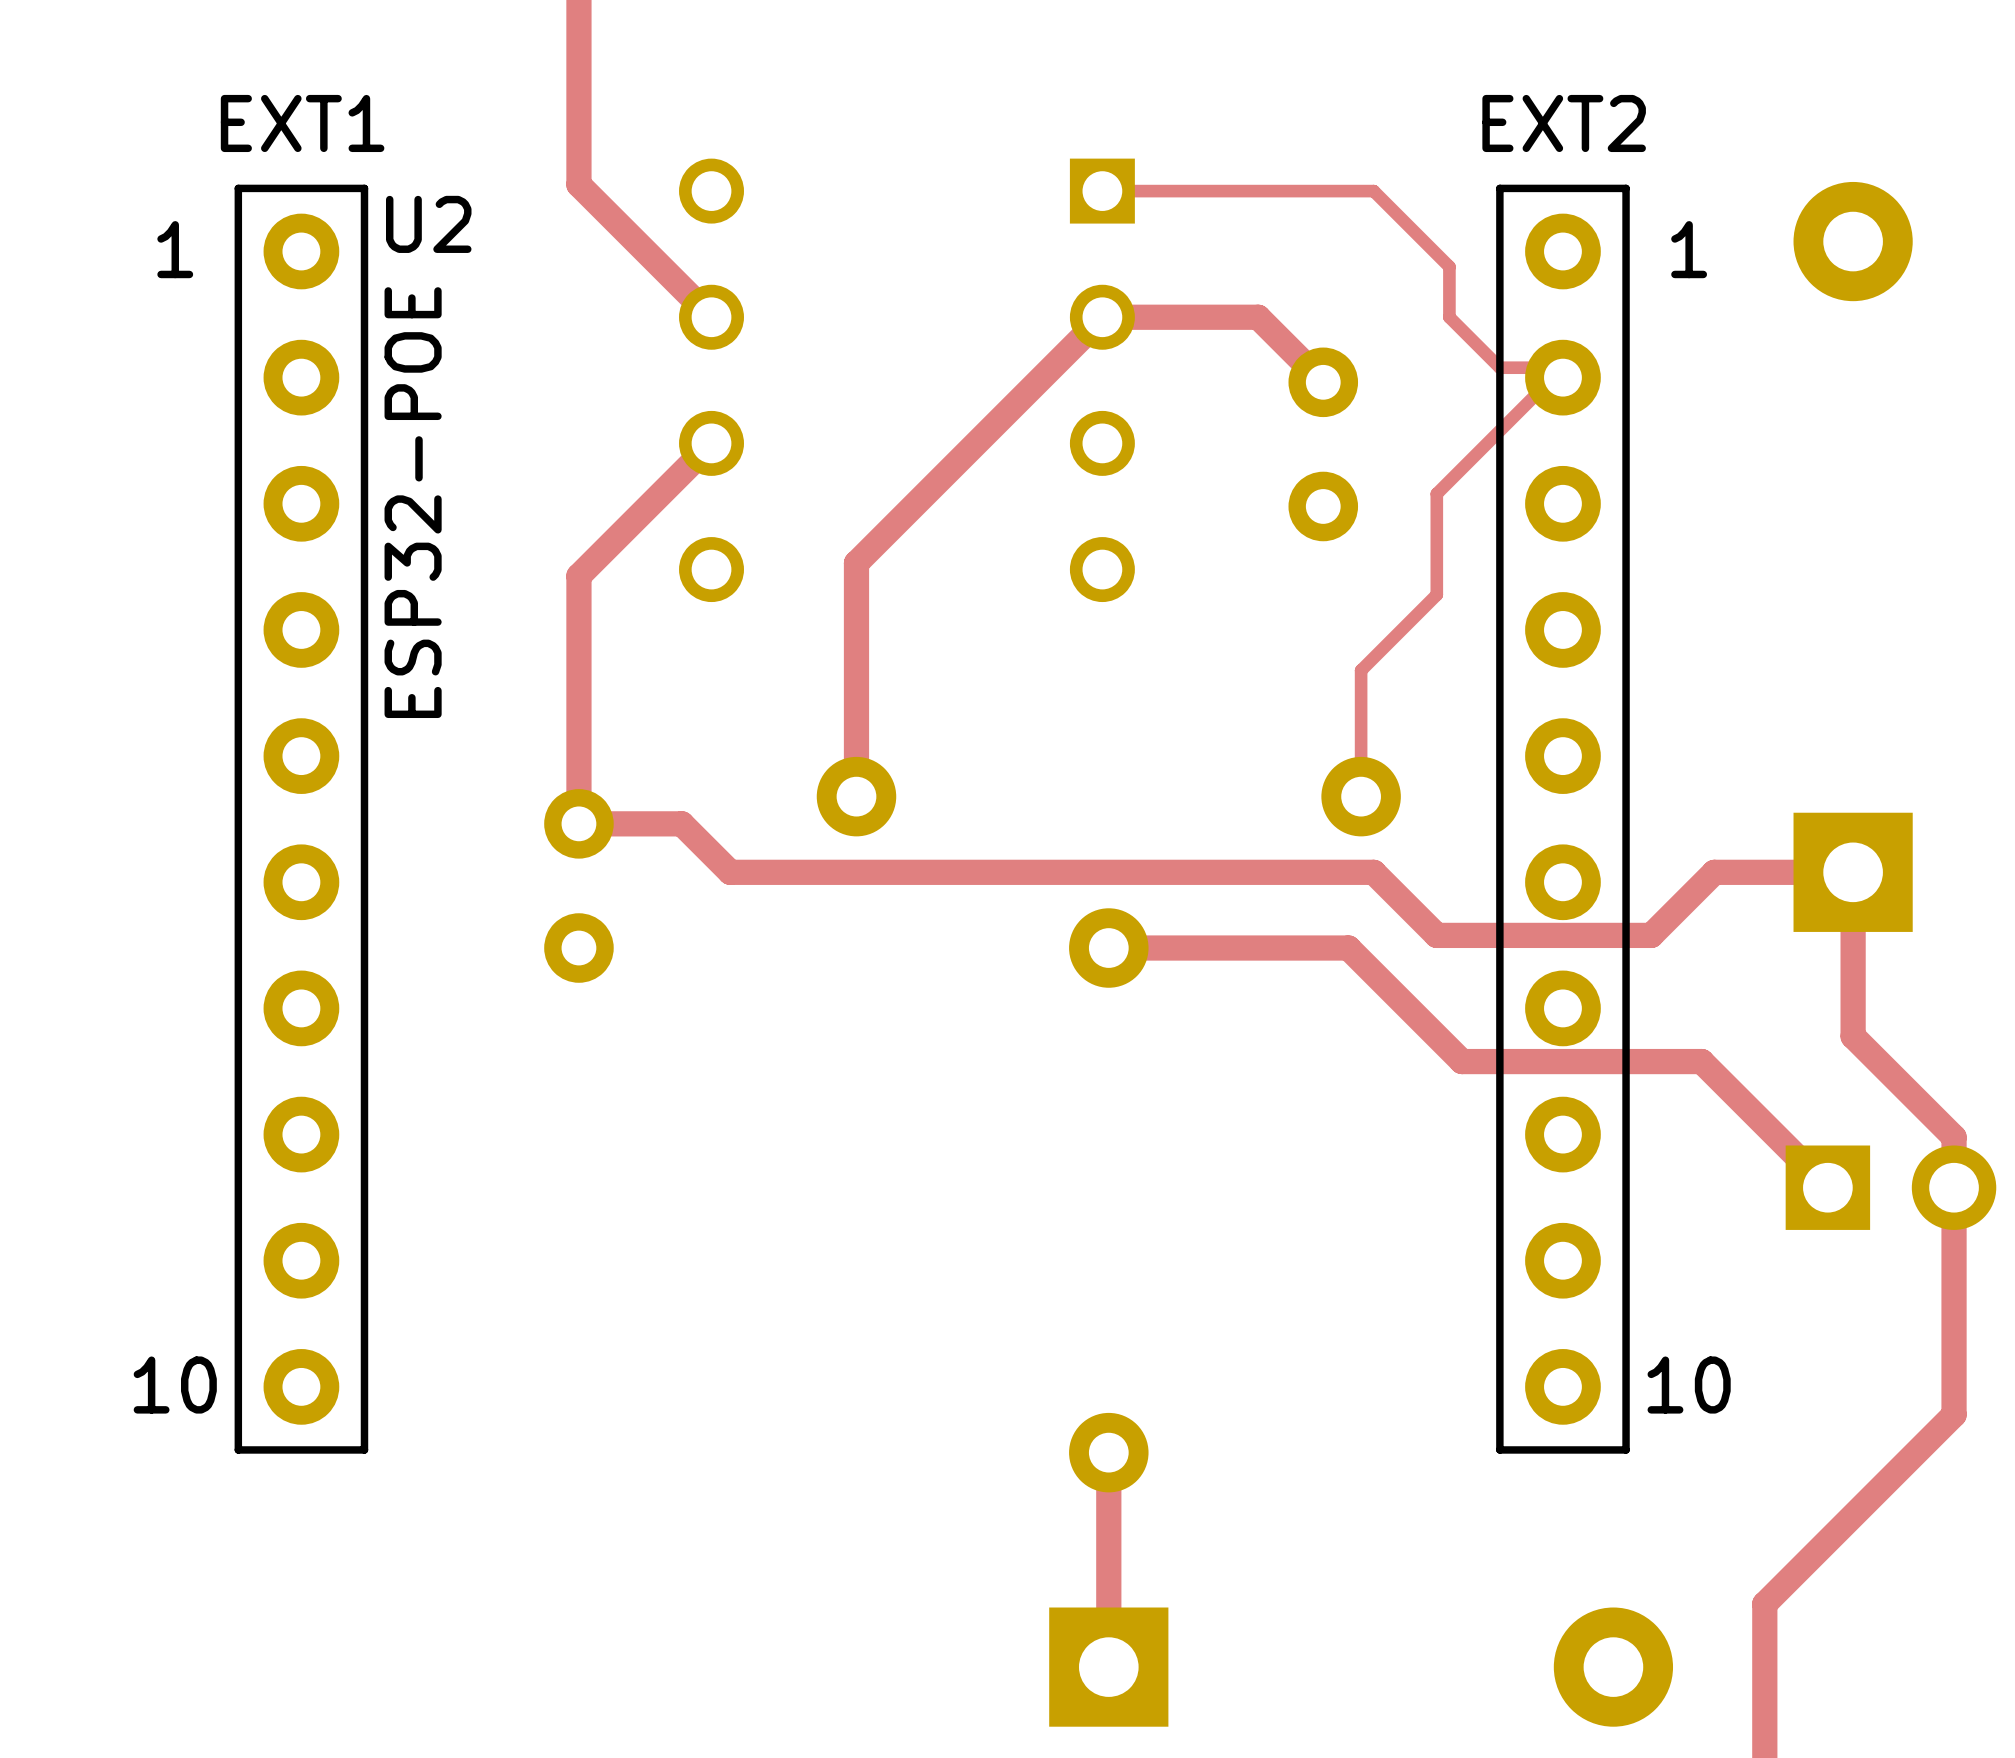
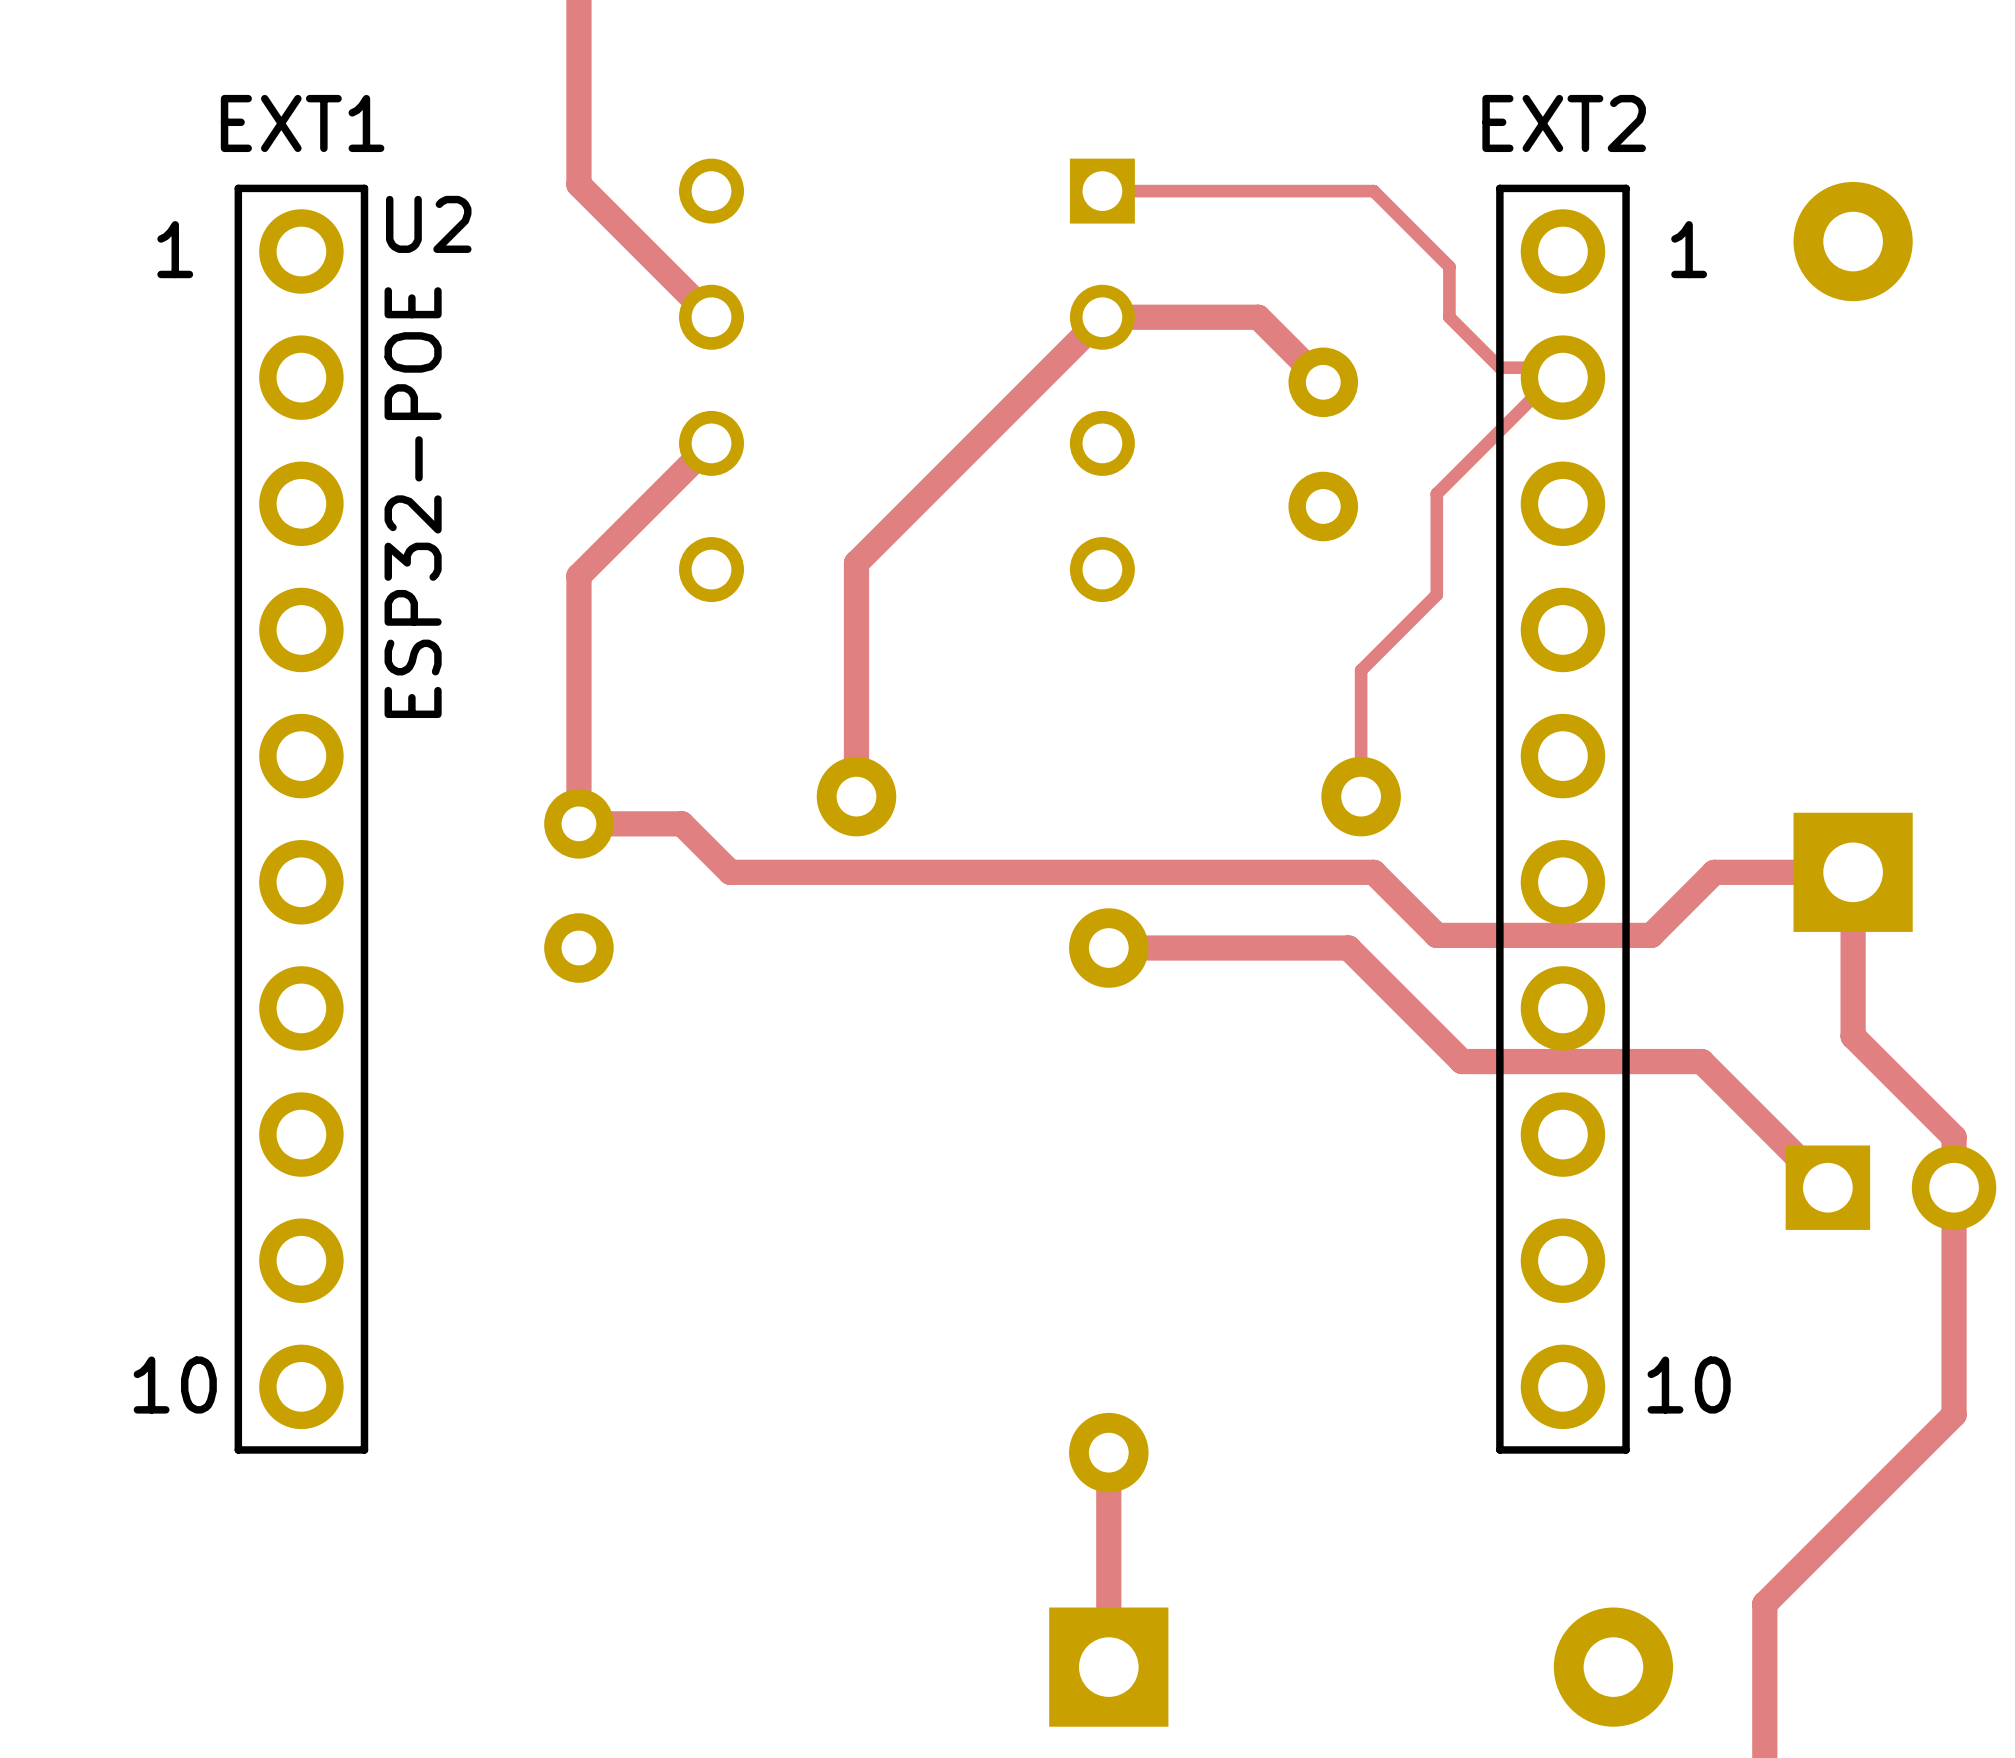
U2 footprint: [234, 184, 1630, 1454] -> [234, 184, 1630, 1454]

